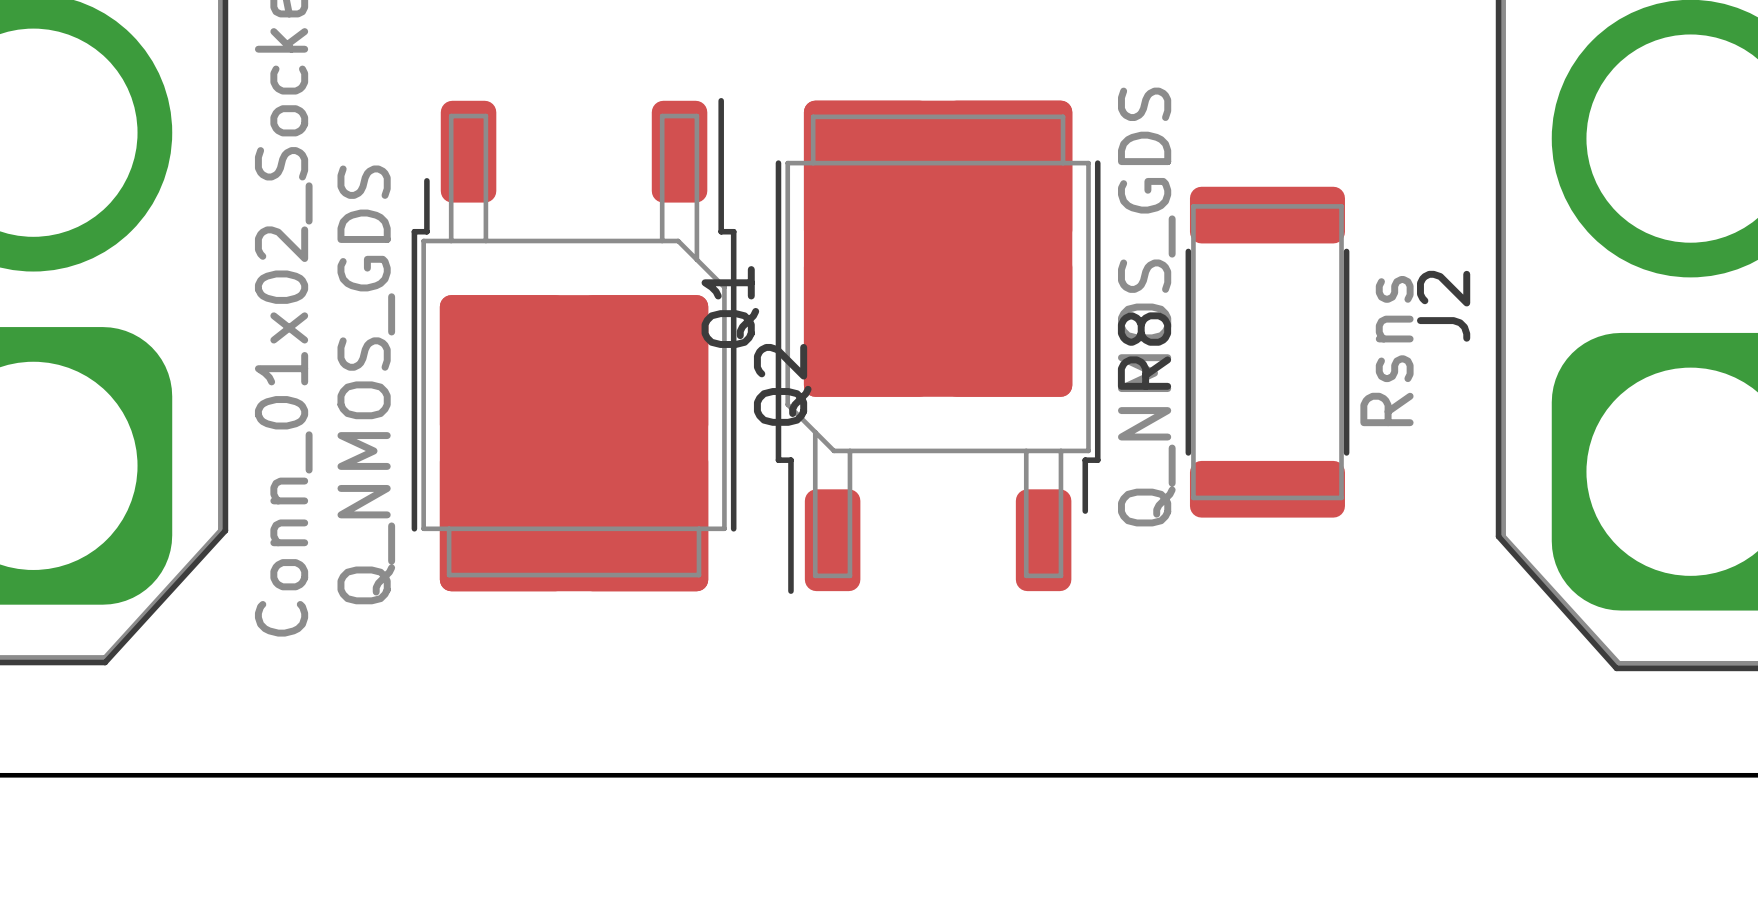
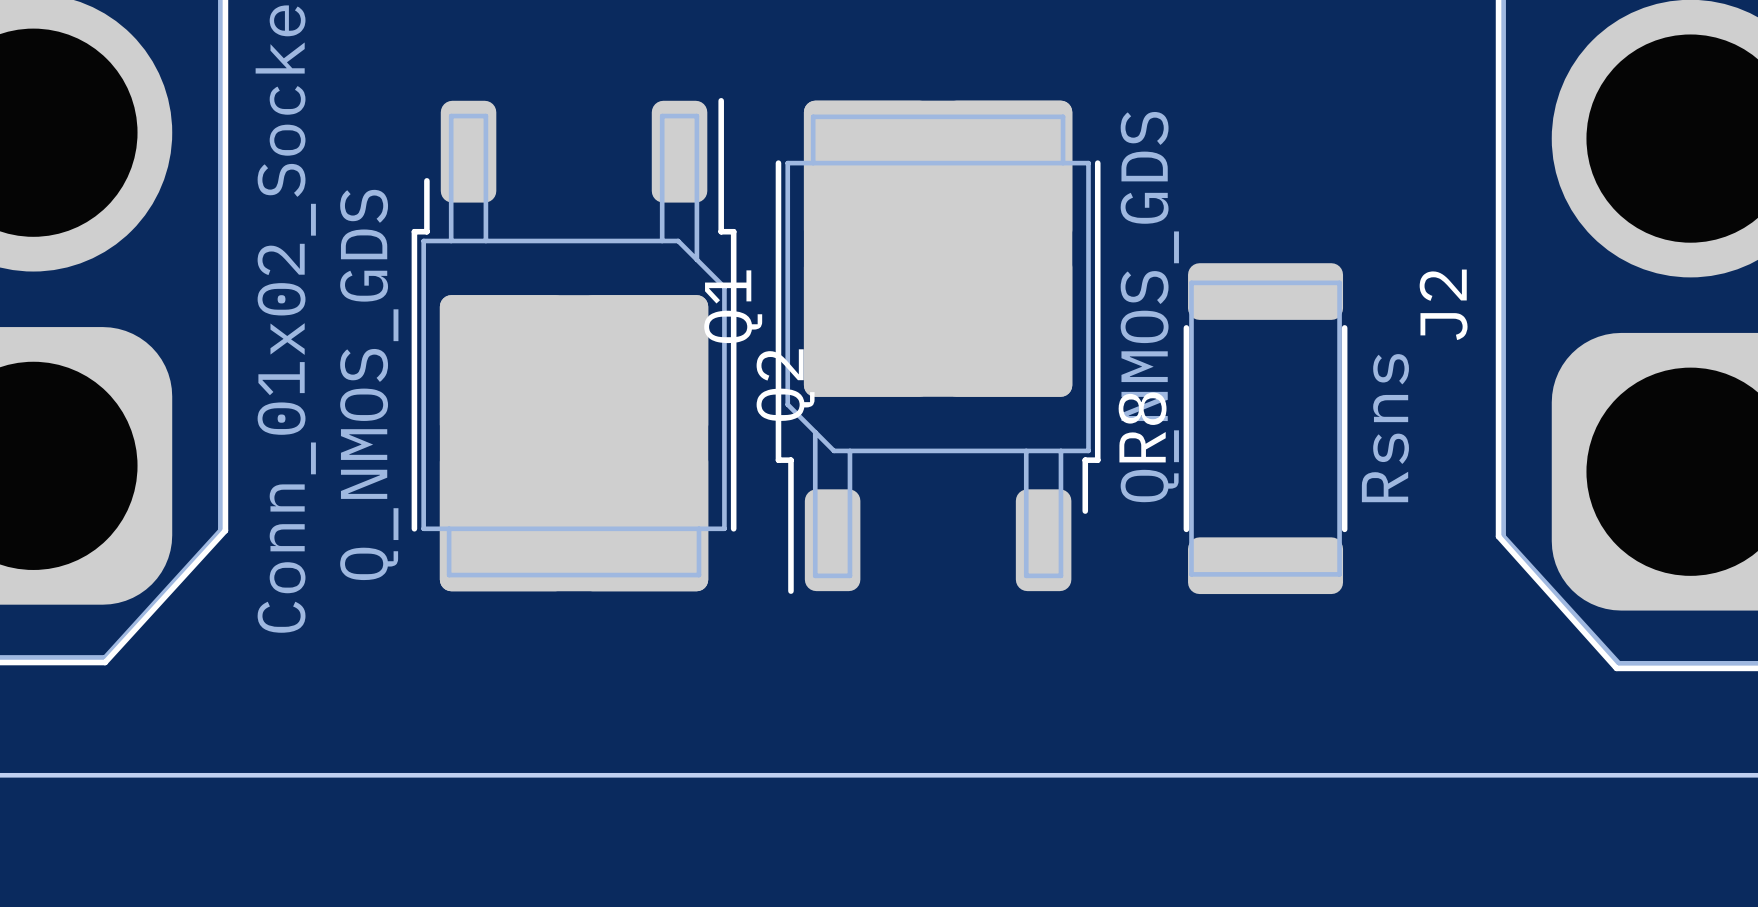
R8 position: (1267, 352) -> (1265, 428)

